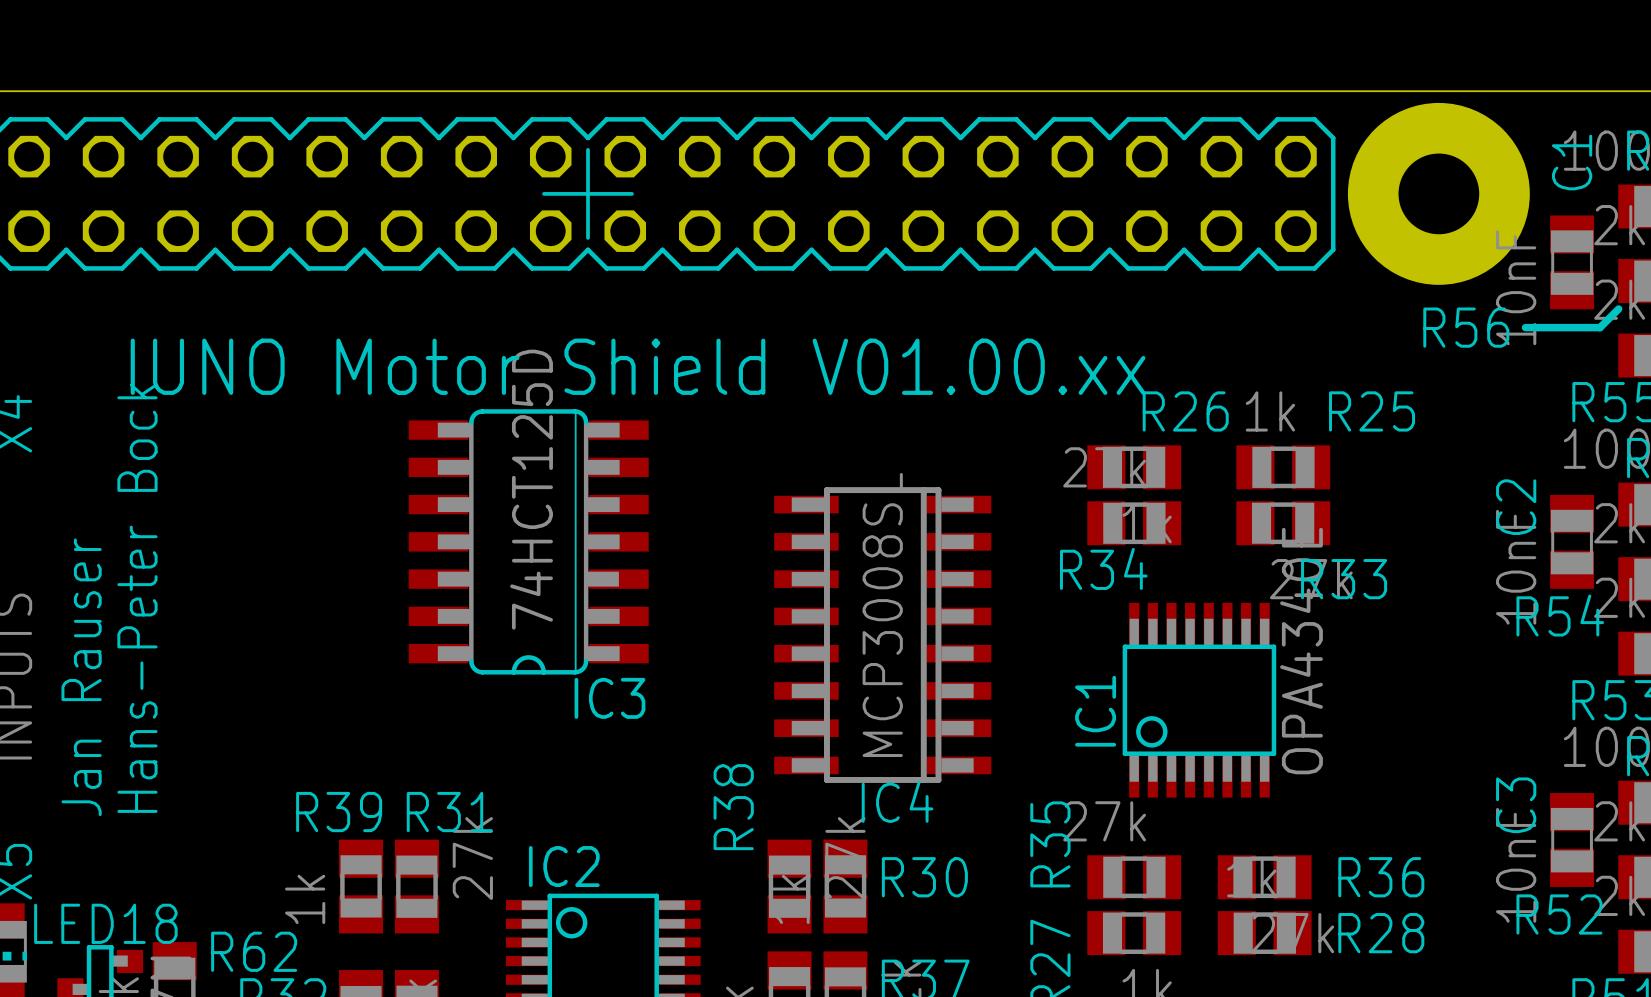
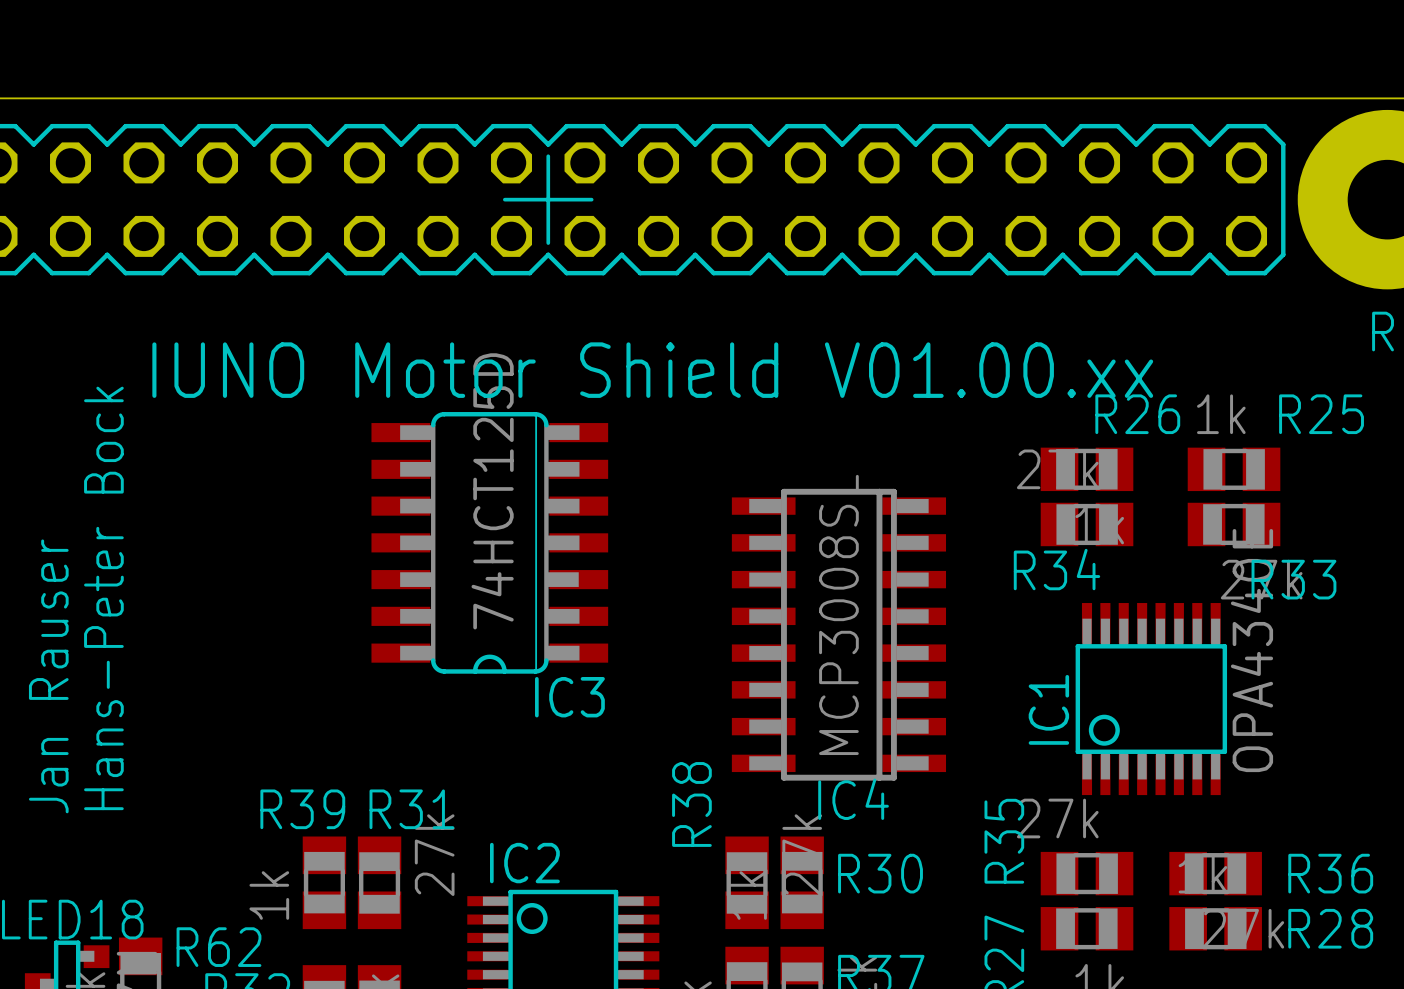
text position: IUNO Motor Shield V01.00.xx (638, 366) -> IUNO Motor Shield V01.00.xx (652, 370)

